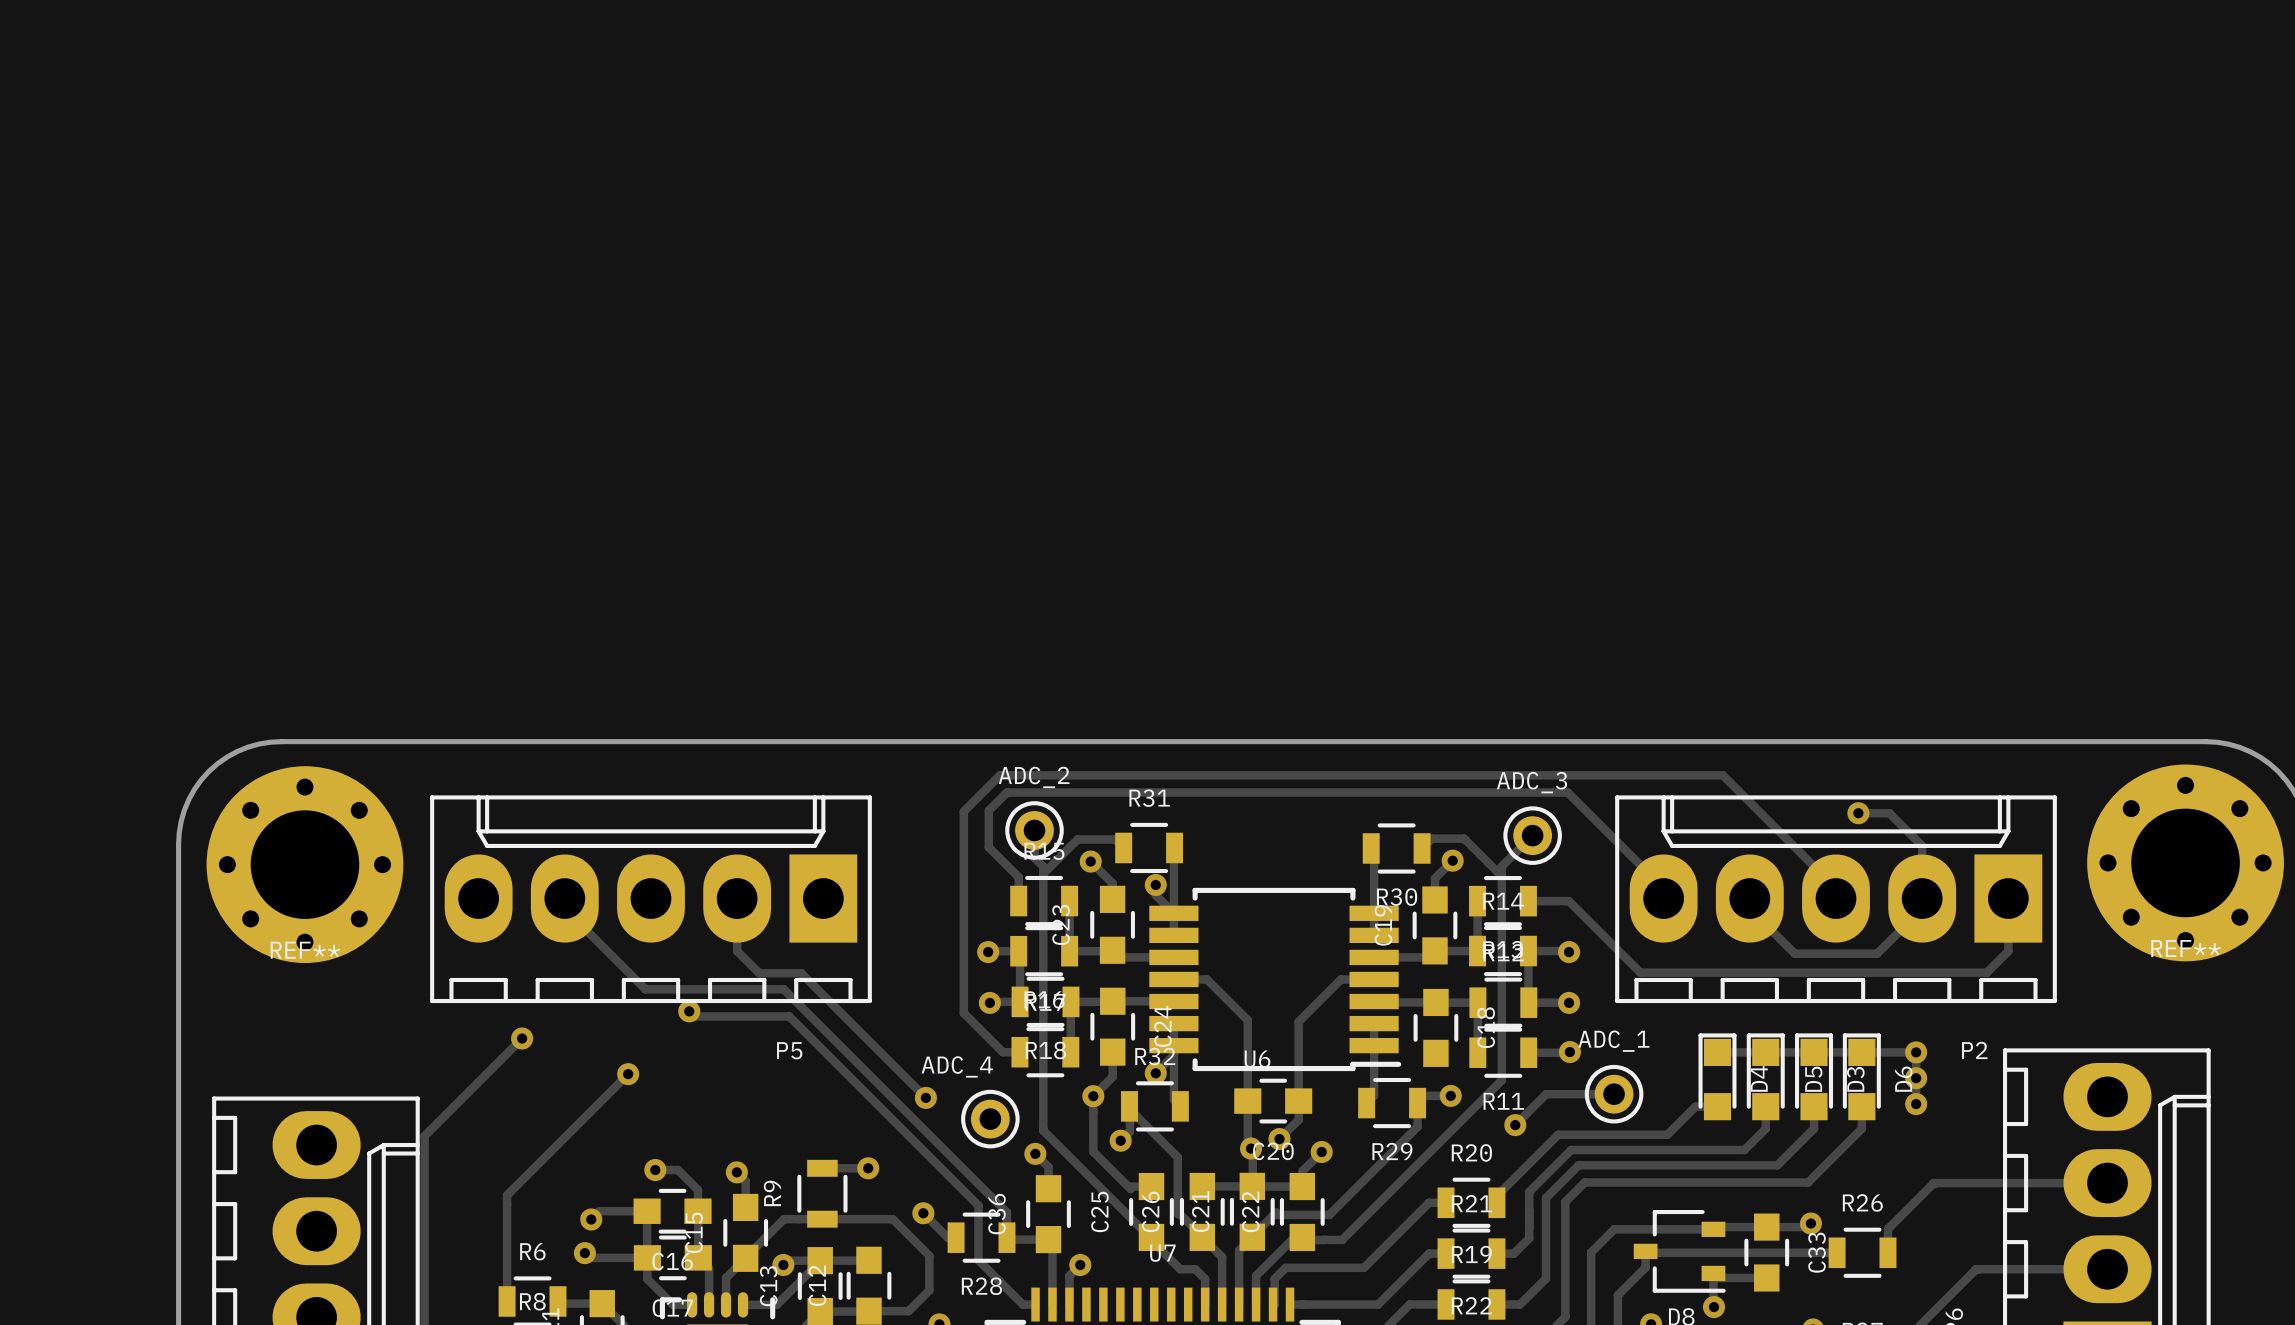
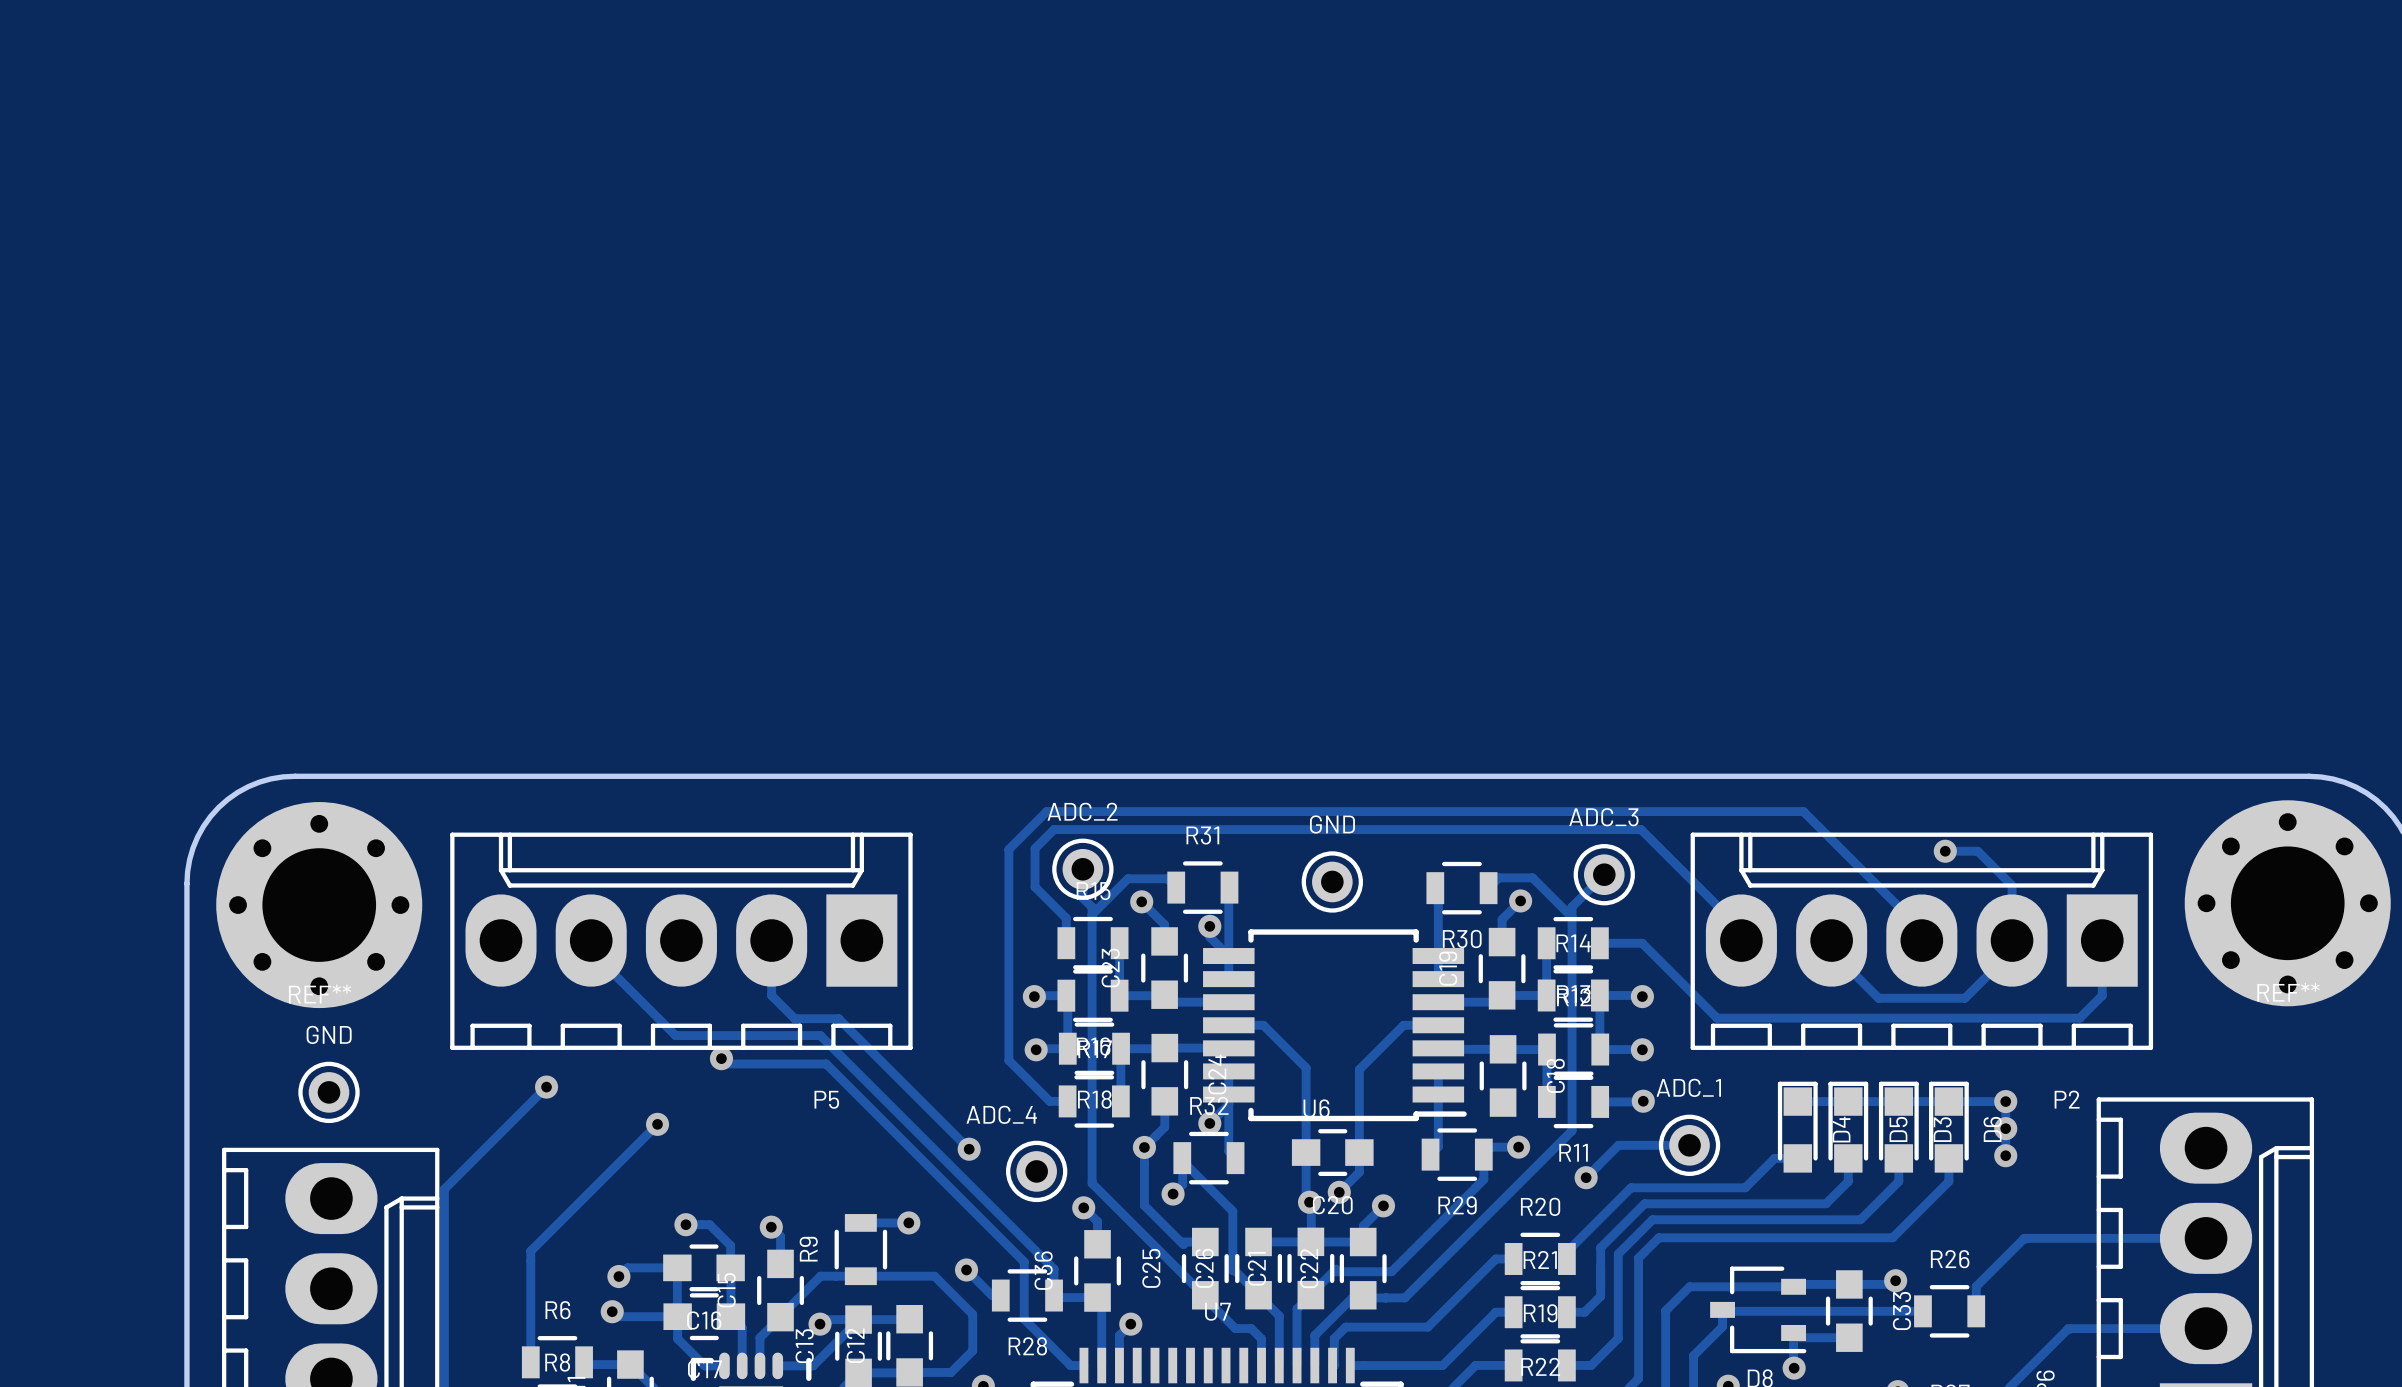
GND: none -> (1332, 881)
GND: none -> (329, 1092)

